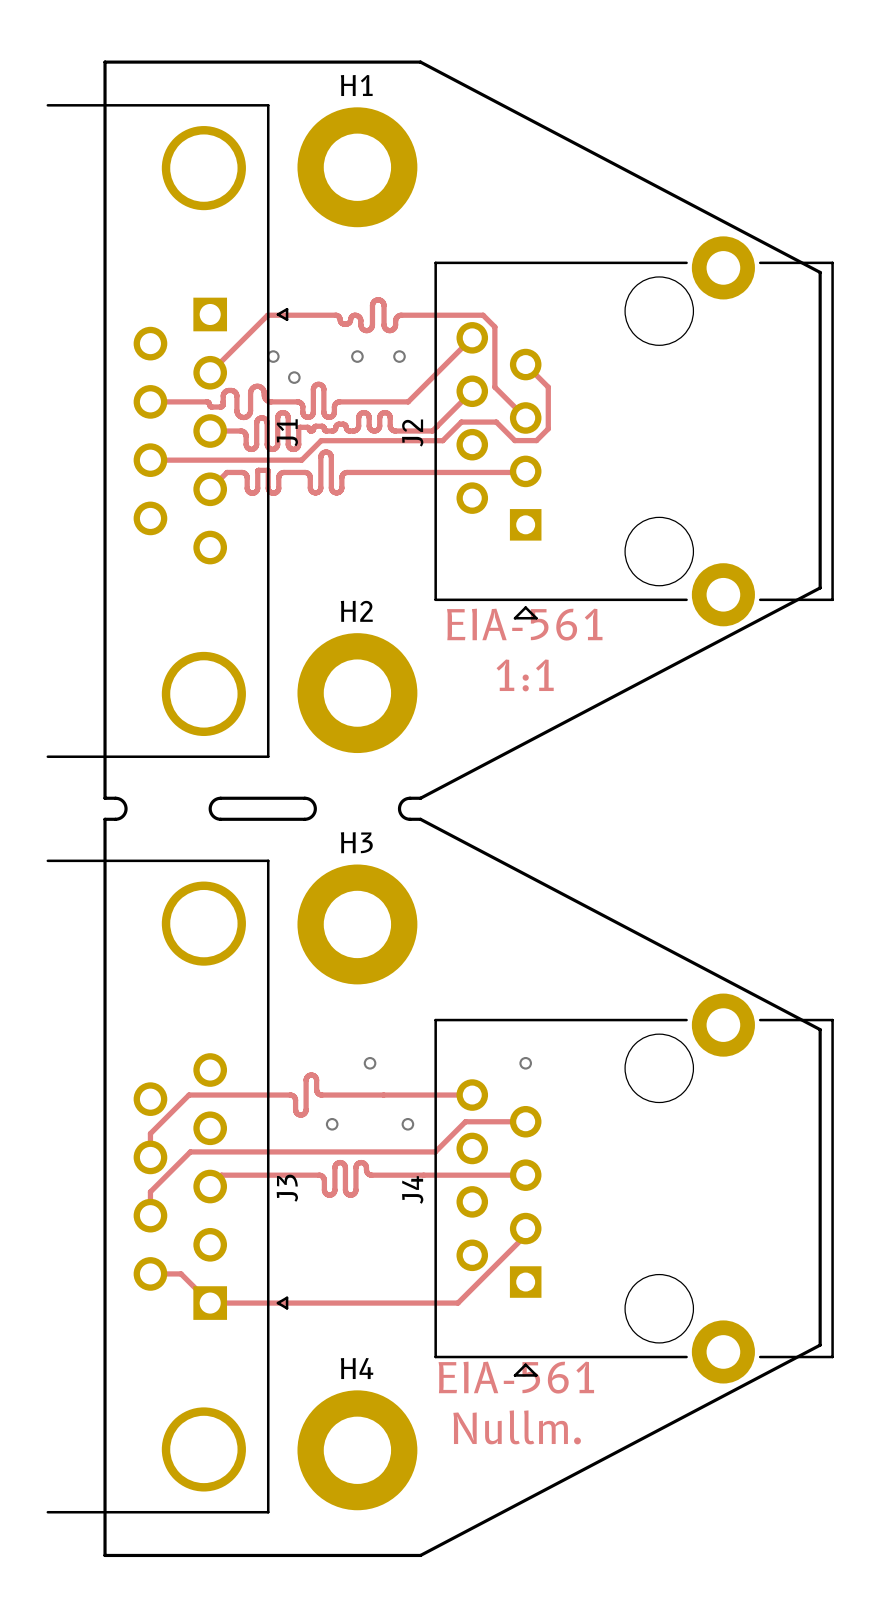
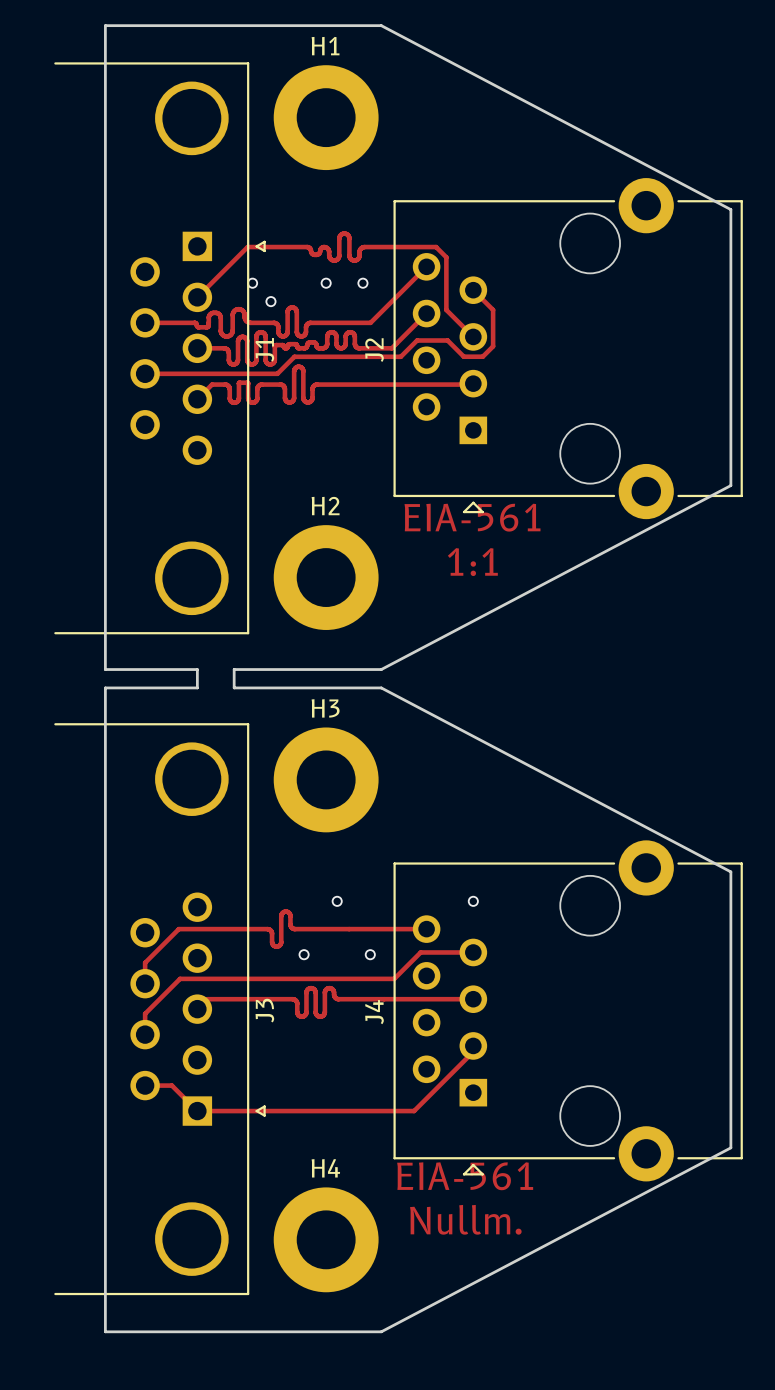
board edge: (115, 798) (122, 801) (126, 808) (122, 816) (115, 819) -> (114, 669) (197, 669) (197, 687) (114, 687)
board edge: (252, 798) (217, 798) (212, 802) (210, 808) (212, 815) (217, 818) (252, 819) -> (234, 669) (234, 687)
board edge: (304, 798) (312, 801) (315, 808) (312, 816) (304, 819) -> (280, 669) (372, 669)
board edge: (410, 798) (402, 801) (399, 808) (402, 816) (410, 819) -> (280, 687) (372, 687)

